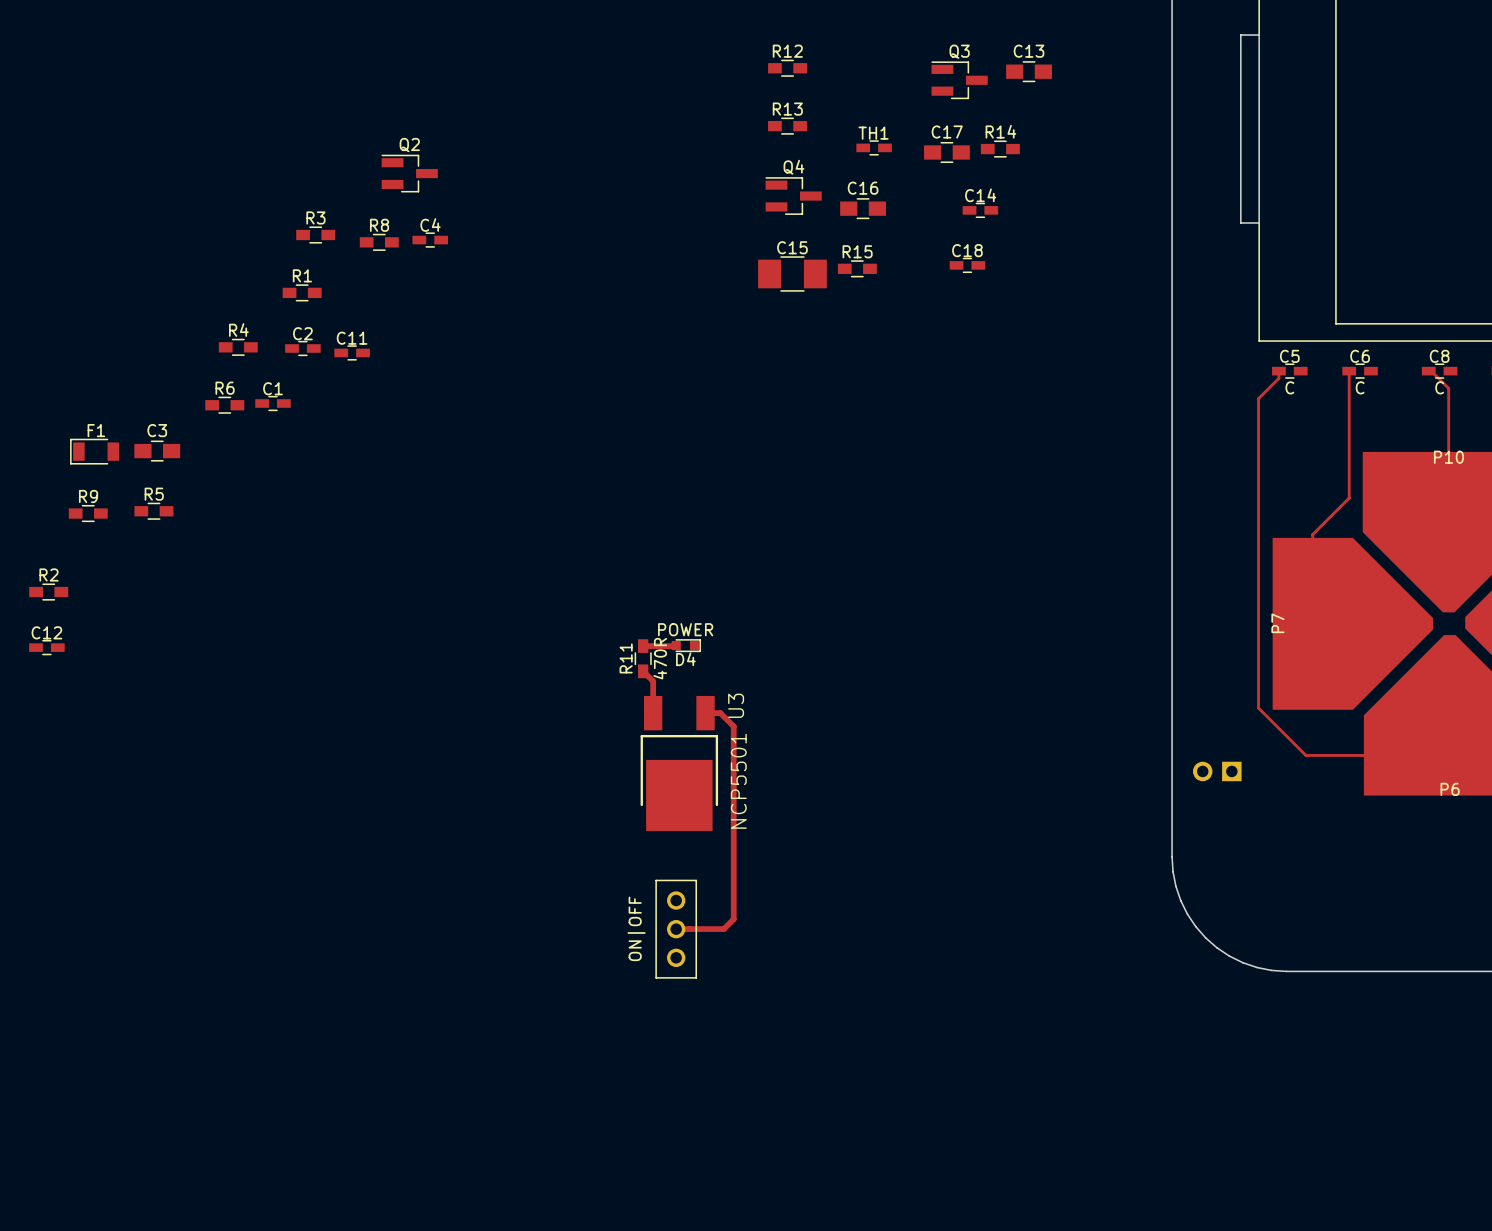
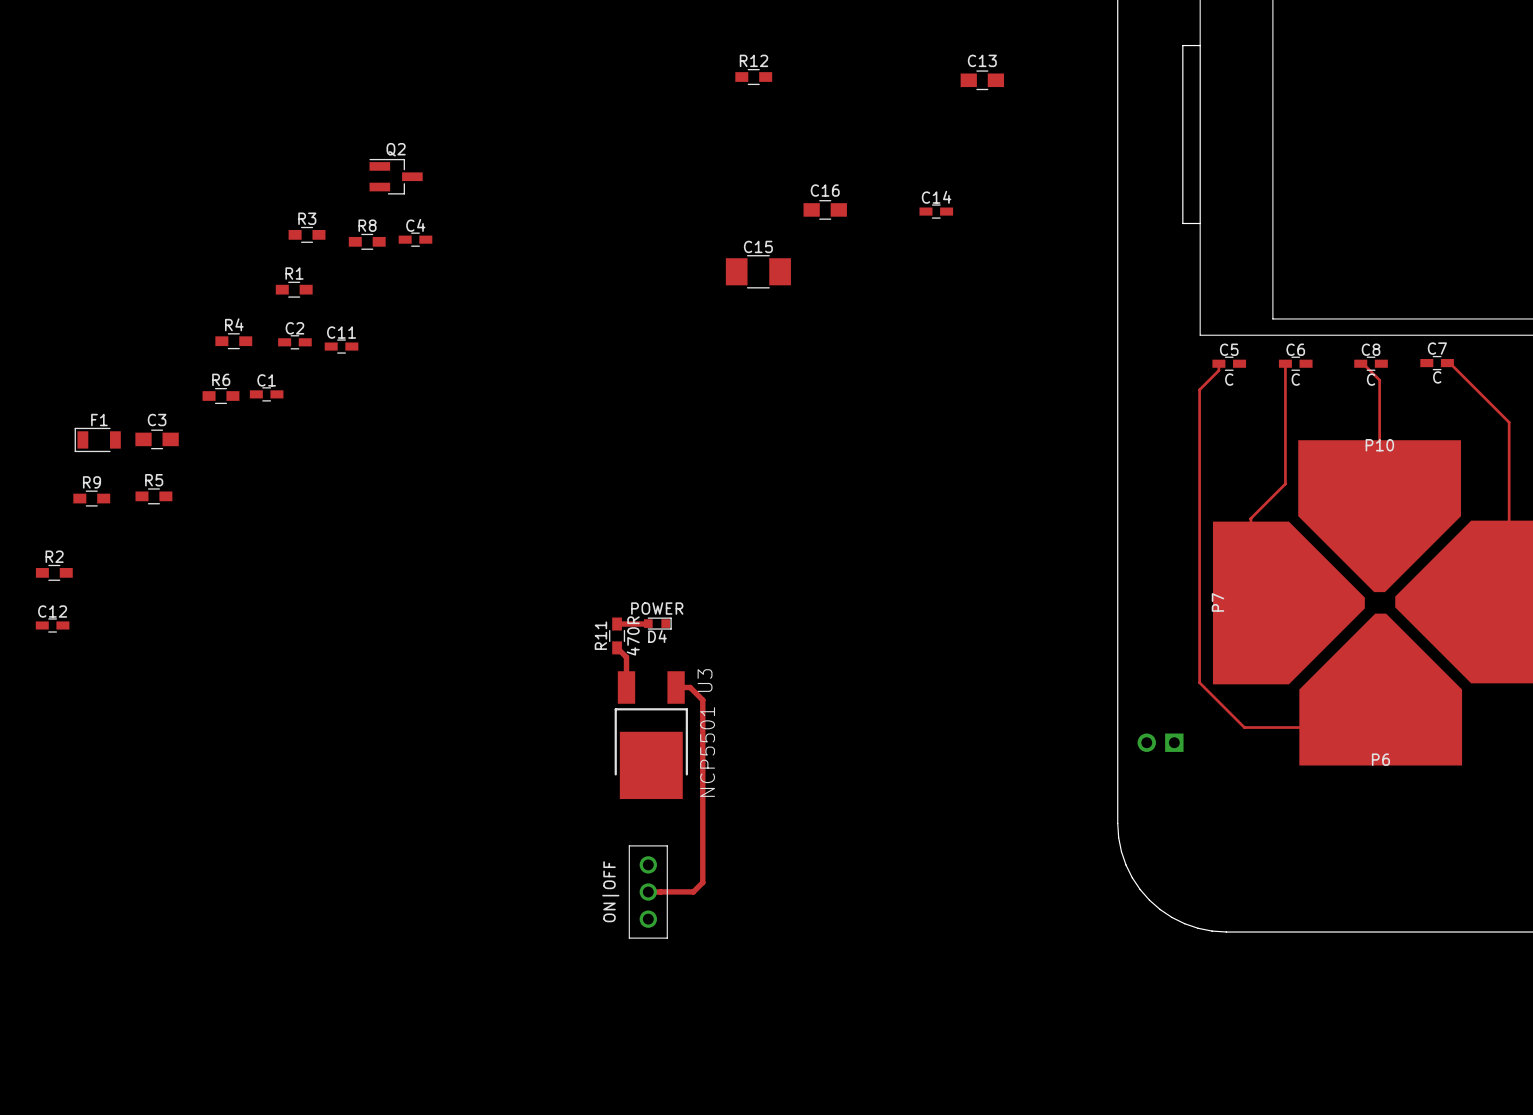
Q3: (959, 80) -> none
R13: (787, 126) -> none
TH1: (874, 147) -> none
R14: (1000, 149) -> none
C17: (946, 152) -> none
Q4: (793, 196) -> none
C18: (967, 265) -> none
R15: (857, 268) -> none

